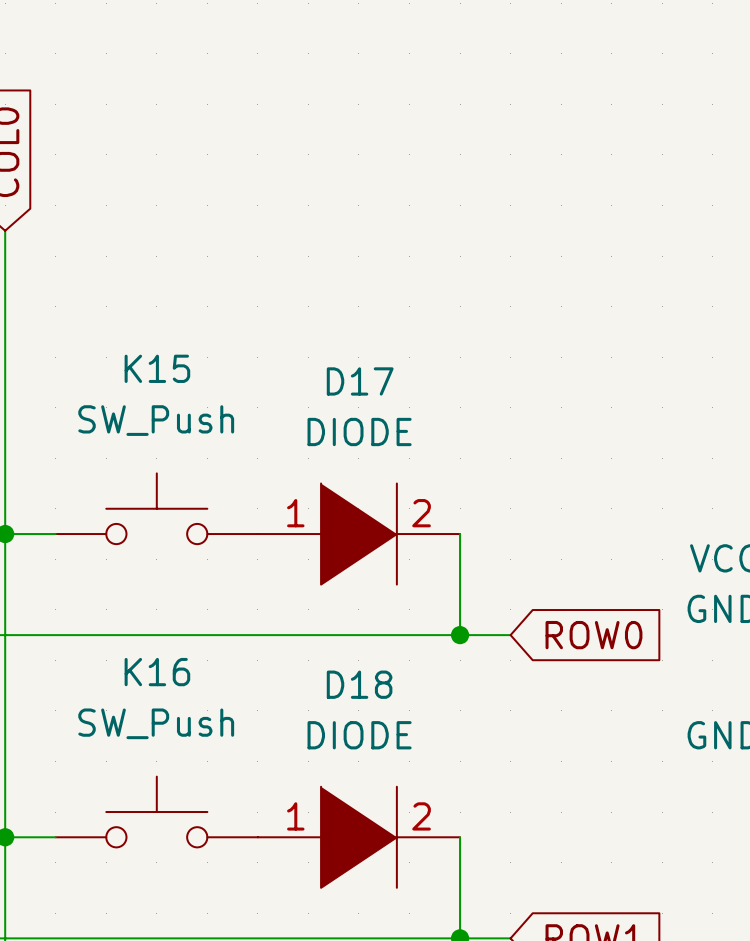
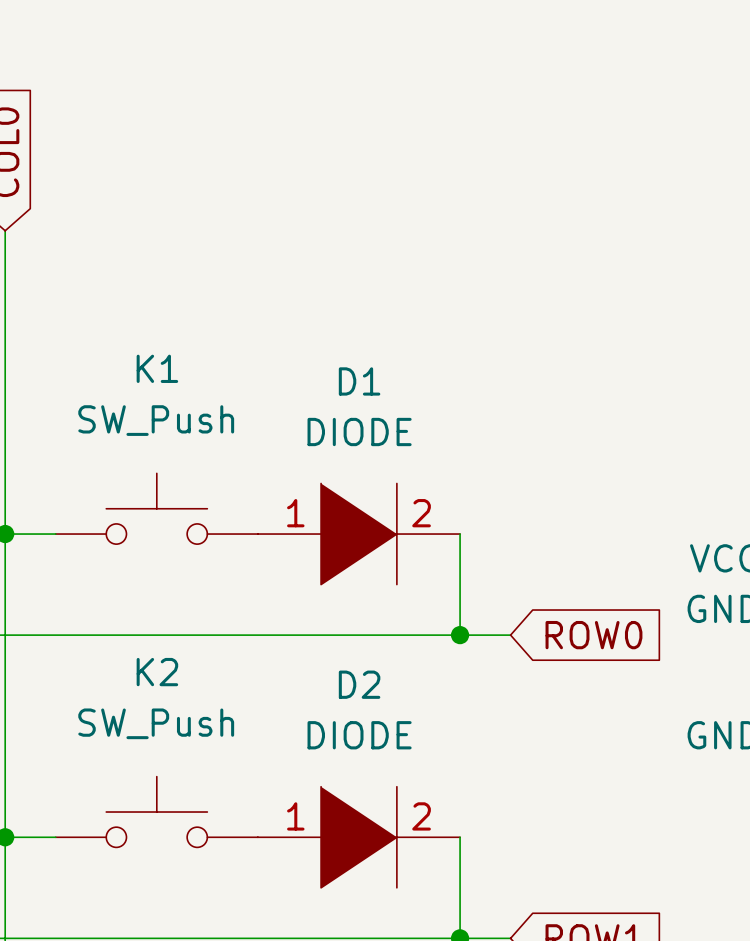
K15 name: K15 (157, 368) -> K1 (157, 368)
D17 name: D17 (360, 381) -> D1 (359, 381)
K16 name: K16 (157, 672) -> K2 (157, 672)
D18 name: D18 (359, 684) -> D2 (359, 684)

